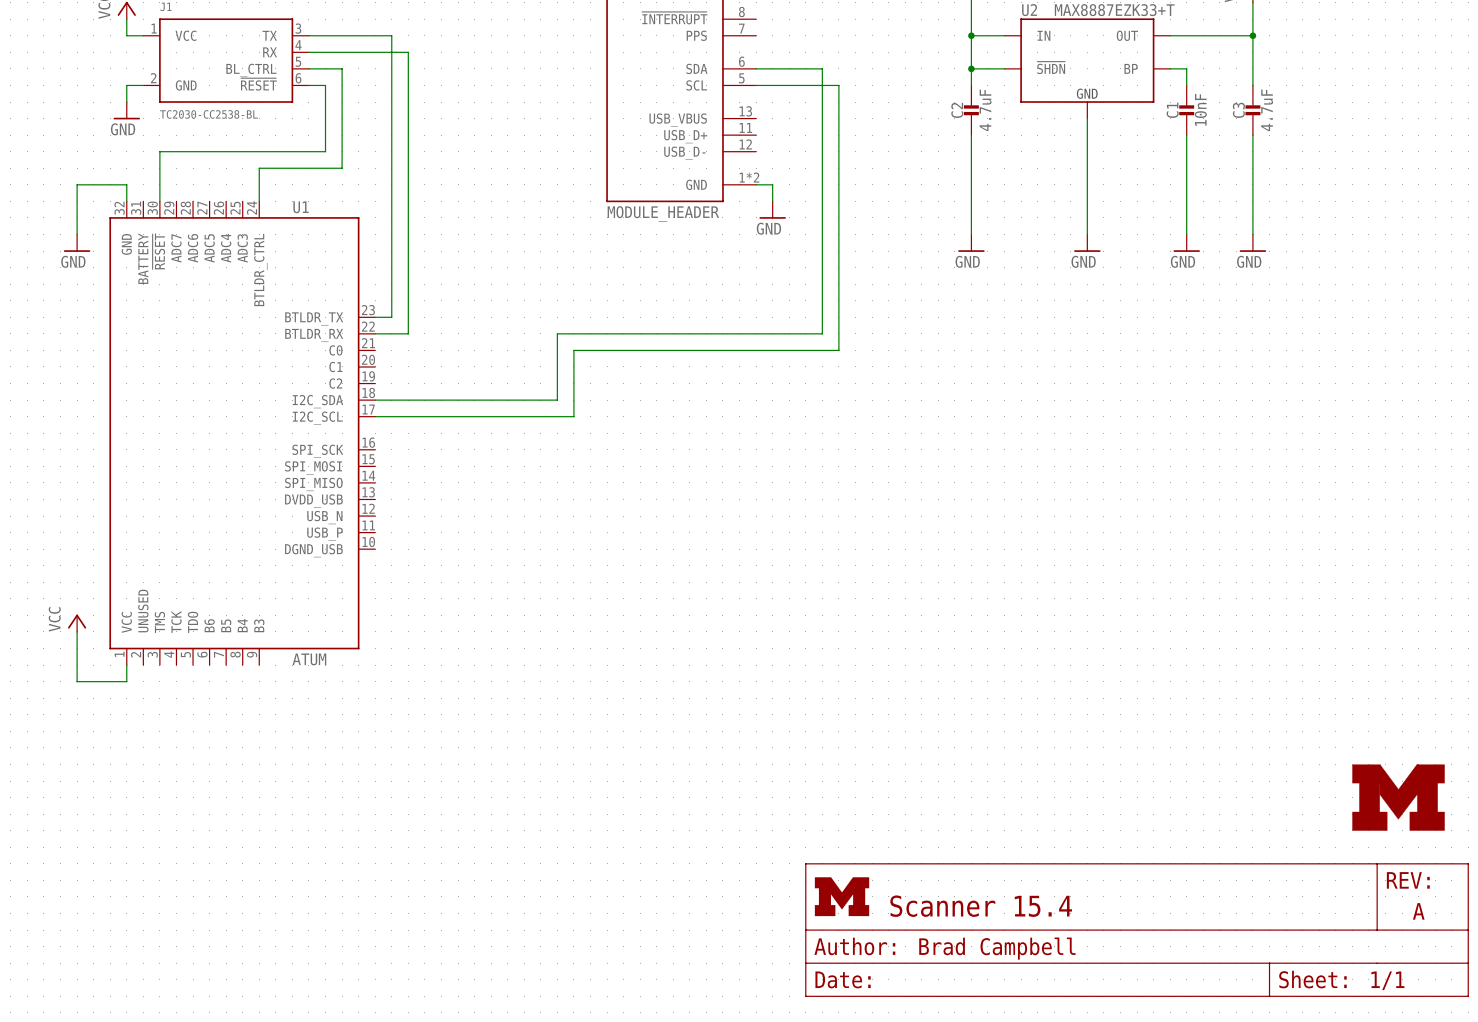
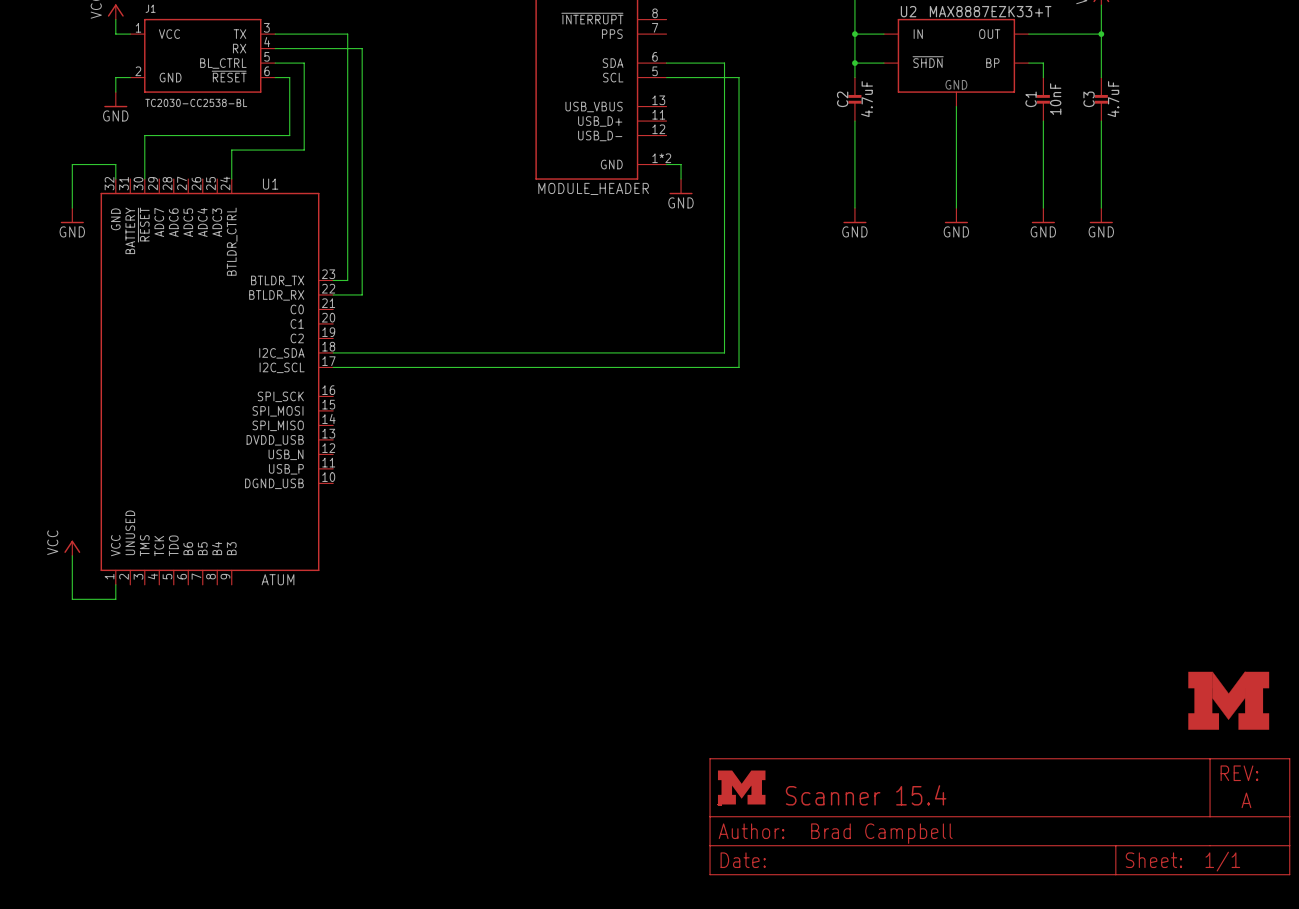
wire: (822, 333) (557, 333) (557, 400) -> (724, 294) (724, 352) (492, 352)
wire: (838, 350) (573, 350) (573, 416) -> (739, 309) (739, 367) (507, 367)

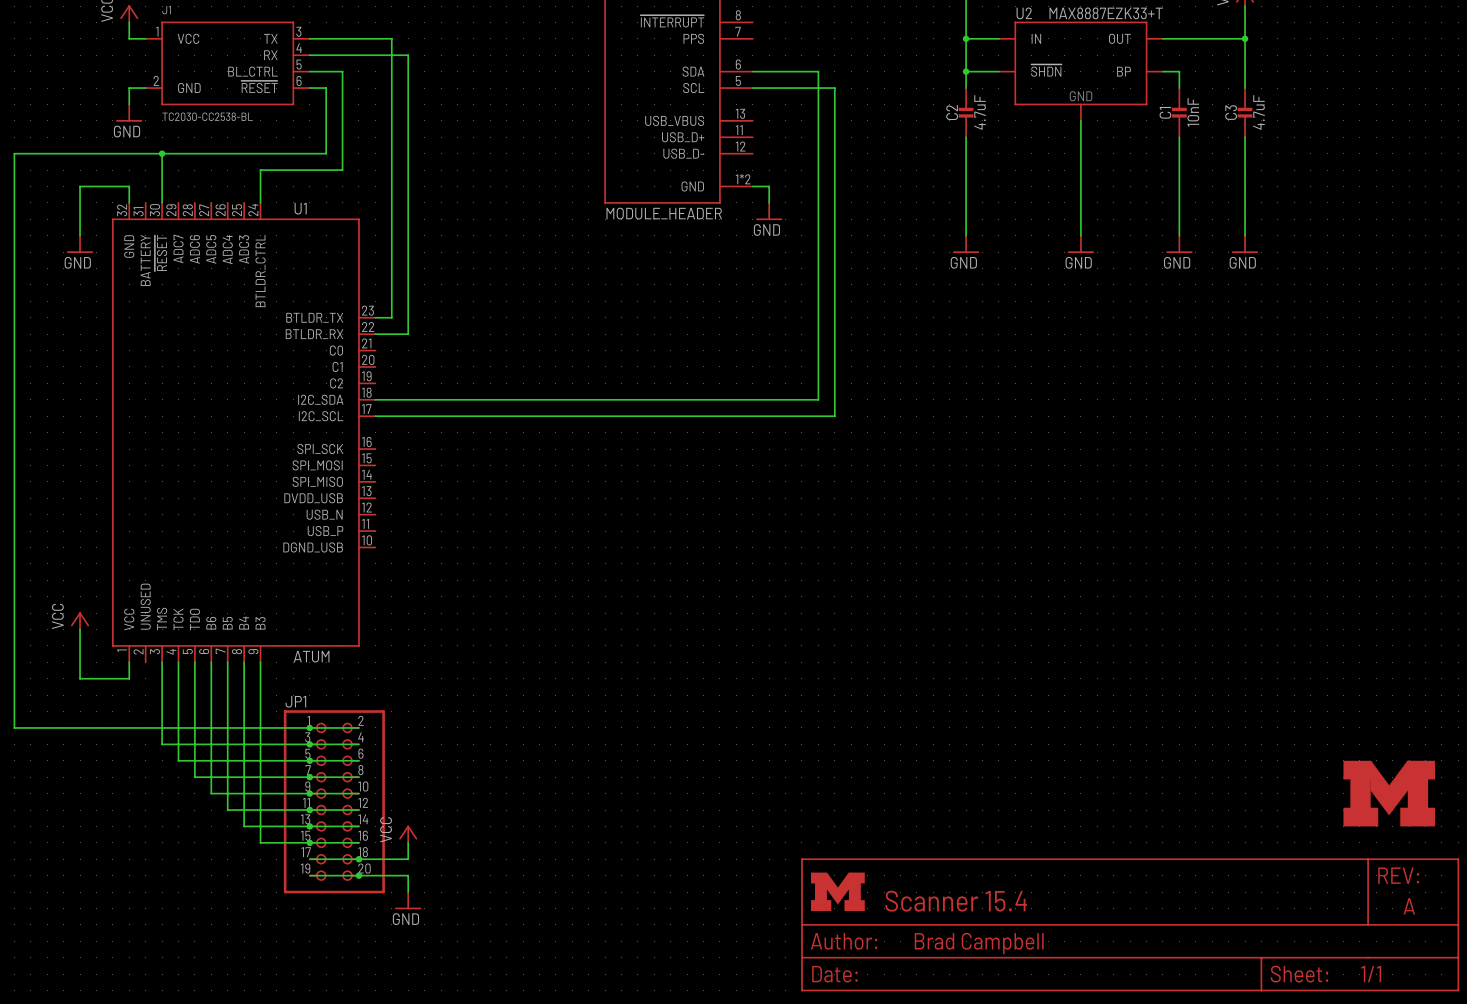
wire: none -> (162, 153) (14, 153) (14, 727) (358, 727)
junction: none -> (162, 153)
wire: none -> (162, 662) (162, 744) (358, 744)
wire: none -> (178, 662) (178, 760) (358, 760)
wire: none -> (194, 662) (194, 777) (358, 777)
wire: none -> (211, 662) (211, 793) (358, 793)
wire: none -> (227, 662) (227, 810) (358, 810)
wire: none -> (244, 662) (244, 826) (358, 826)
wire: none -> (260, 662) (260, 842) (358, 842)
junction: none -> (309, 727)
junction: none -> (309, 744)
junction: none -> (309, 760)
junction: none -> (309, 777)
junction: none -> (309, 793)
JP1: none -> (334, 801)
junction: none -> (309, 810)
junction: none -> (309, 826)
power symbol: none -> VCC (408, 834)
junction: none -> (309, 842)
wire: none -> (408, 842) (408, 859) (309, 859)
junction: none -> (358, 859)
wire: none -> (309, 875) (408, 875) (408, 892)
junction: none -> (358, 875)
power symbol: none -> GND (408, 900)

